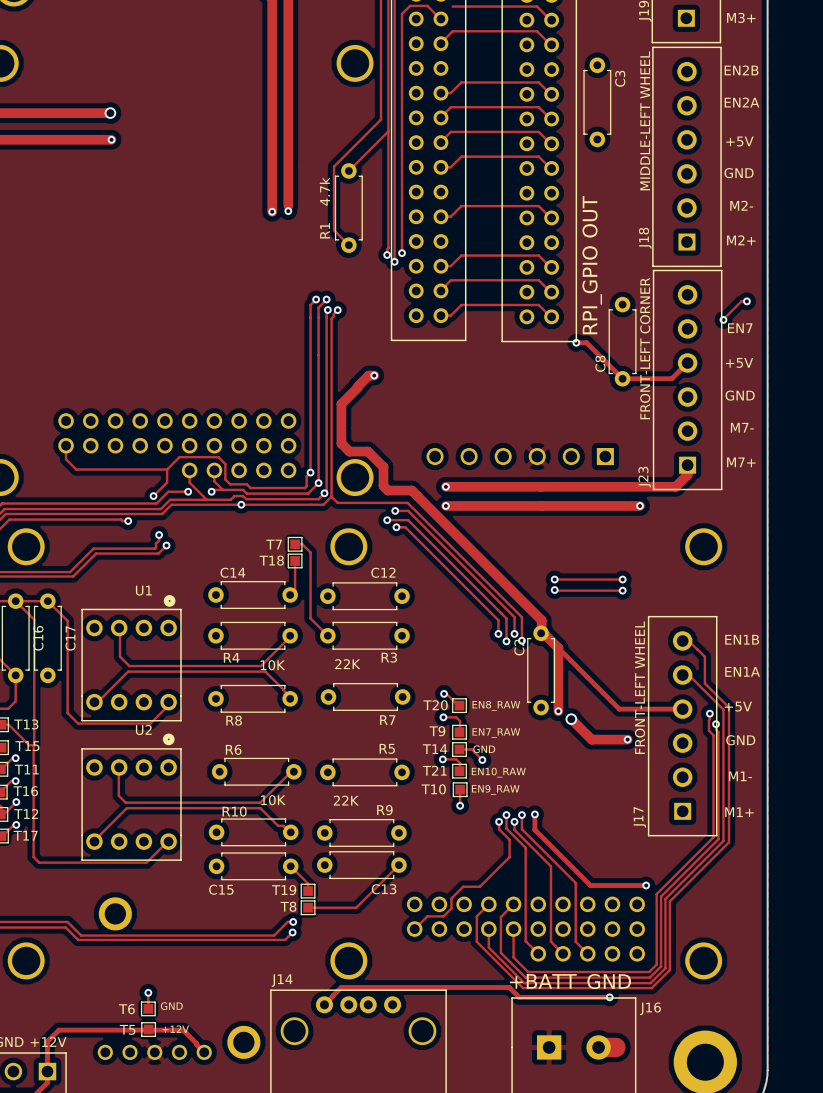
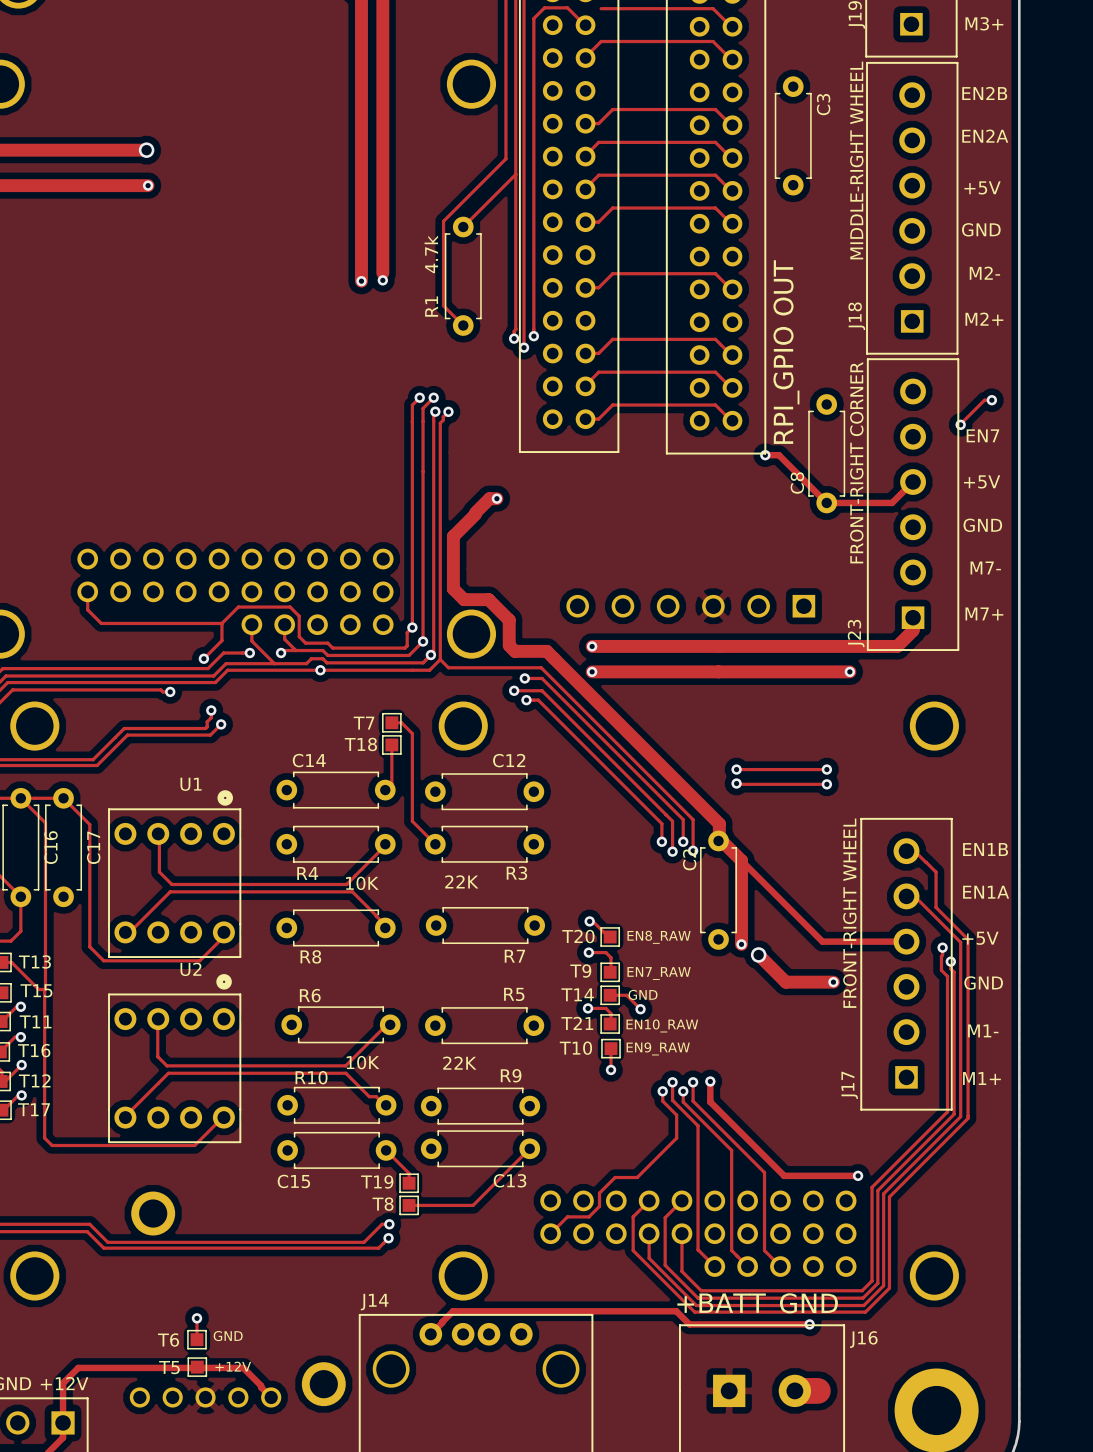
text: MIDDLE-LEFT WHEEL (645, 120) -> MIDDLE-RIGHT WHEEL (856, 160)
text: FRONT-LEFT CORNER (645, 348) -> FRONT-RIGHT CORNER (856, 462)
text: FRONT-LEFT WHEEL (640, 687) -> FRONT-RIGHT WHEEL (849, 913)

